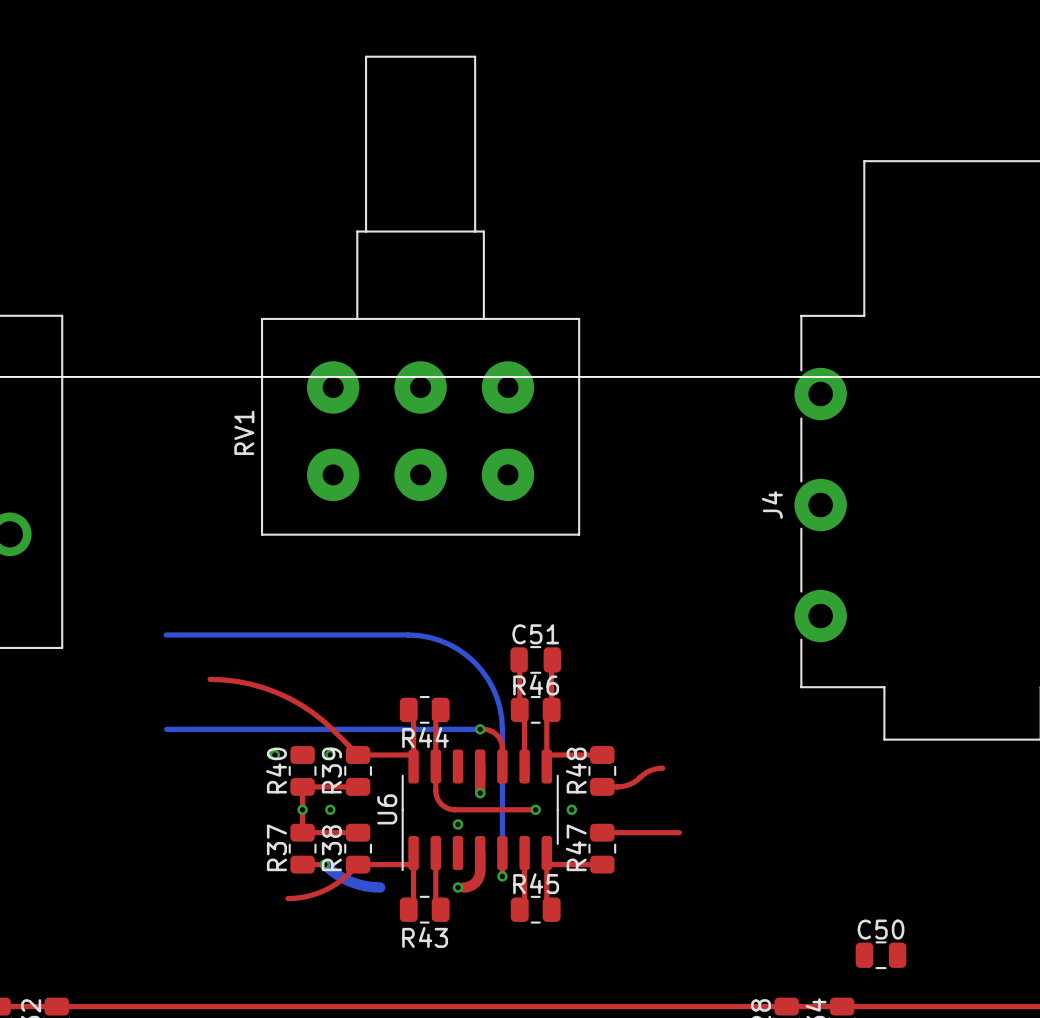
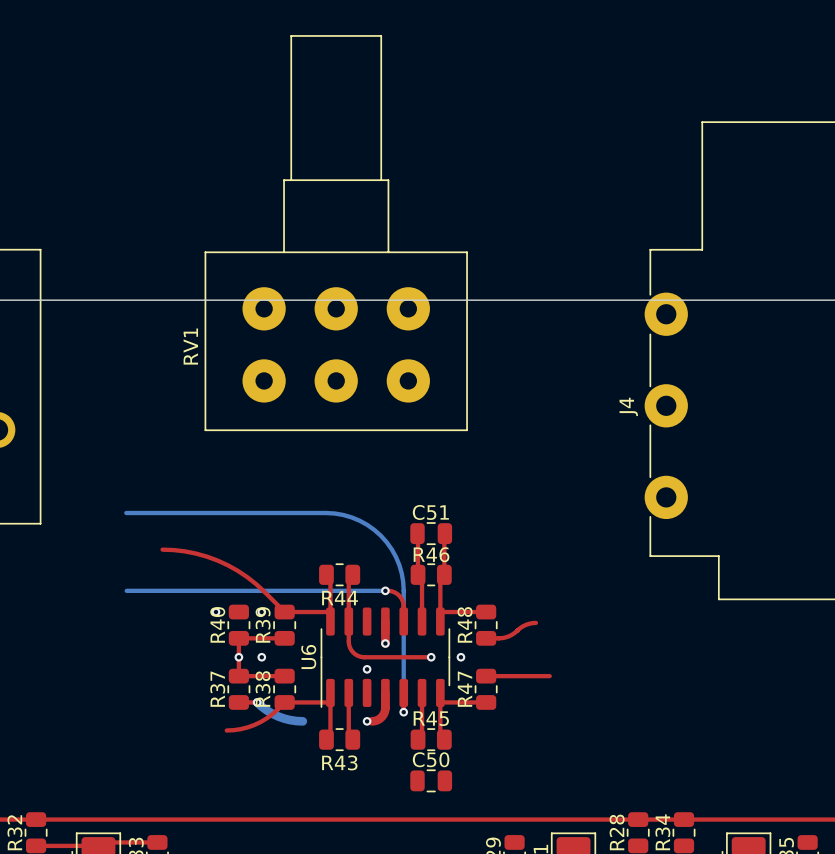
C50 position: (881, 955) -> (431, 780)

